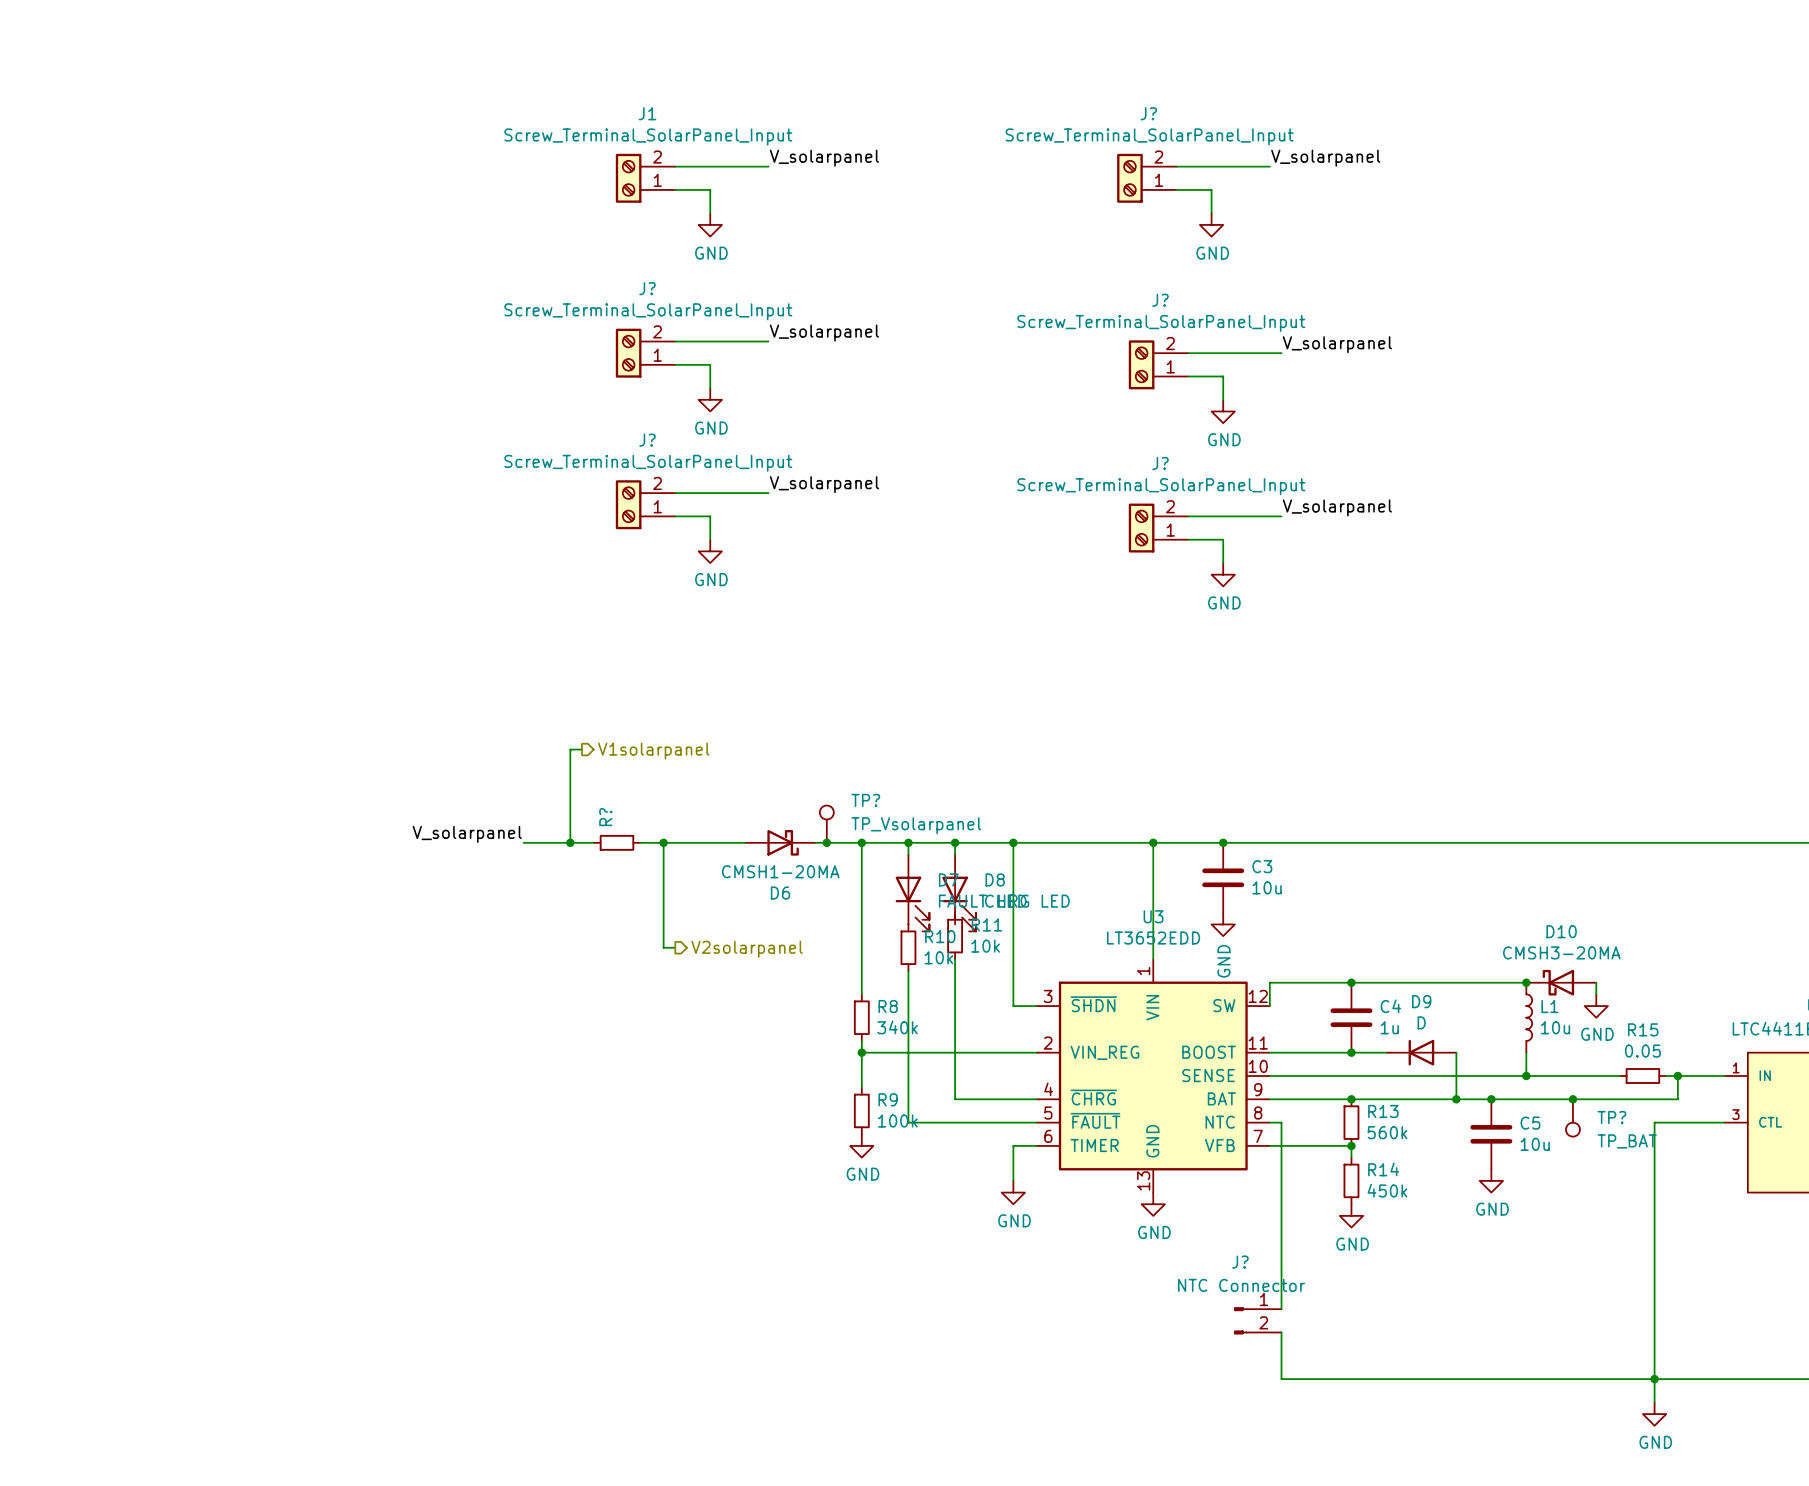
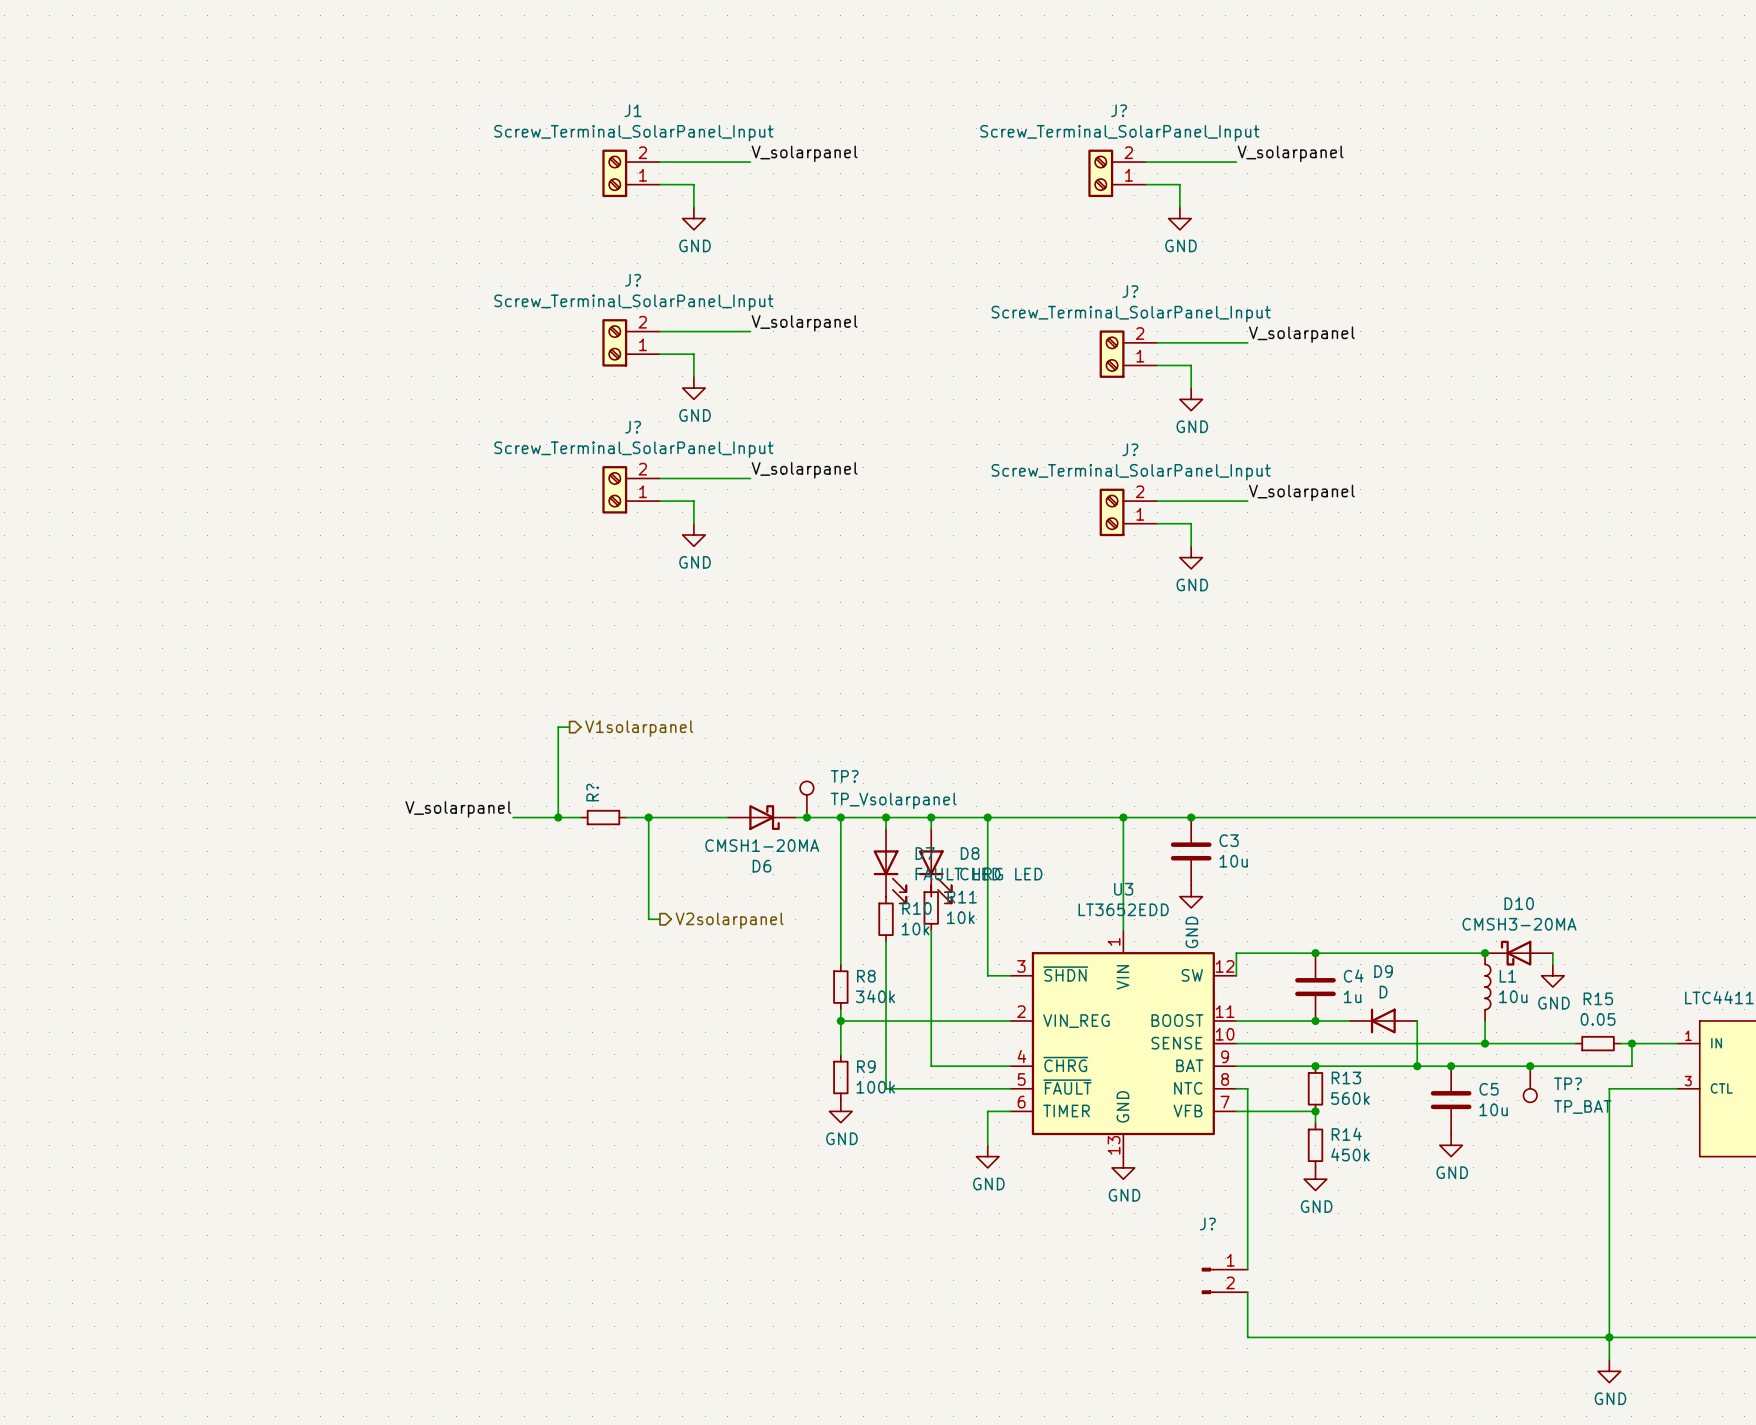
J? value: NTC Connector (1241, 1285) -> none

